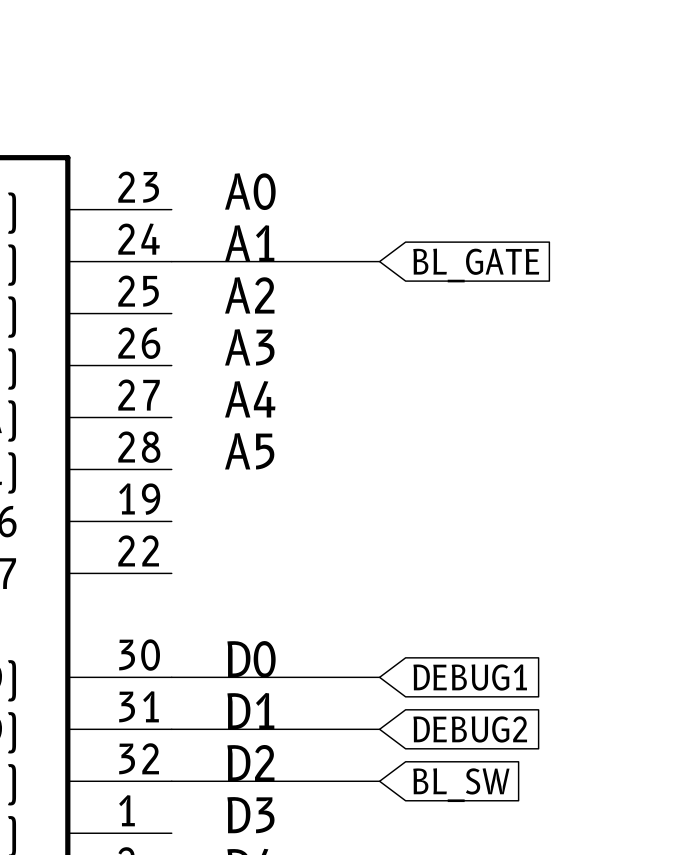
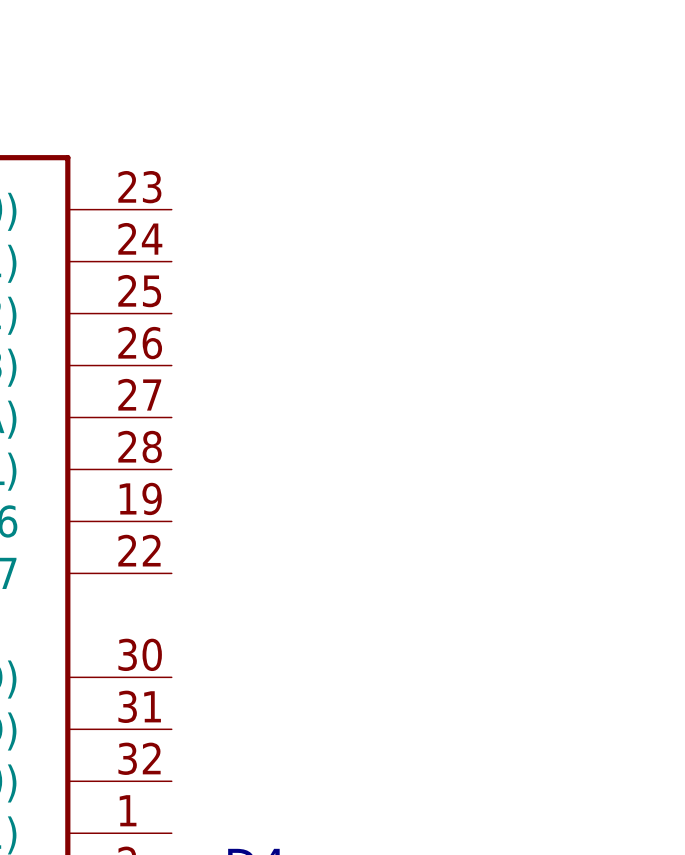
text: A0 (250, 191) -> none
text: A1 (249, 243) -> none
wire: (171, 261) (379, 261) -> none
global label: BL_GATE (476, 265) -> none
text: A2 (249, 295) -> none
text: A3 (249, 347) -> none
text: A4 (250, 399) -> none
text: A5 (249, 451) -> none
text: D0 (251, 659) -> none
wire: (171, 677) (379, 677) -> none
global label: DEBUG1 (470, 677) -> none
text: D1 (250, 711) -> none
wire: (171, 729) (379, 729) -> none
global label: DEBUG2 (470, 729) -> none
text: D2 (250, 763) -> none
wire: (171, 781) (379, 781) -> none
global label: BL_SW (461, 785) -> none
text: D3 (250, 815) -> none

